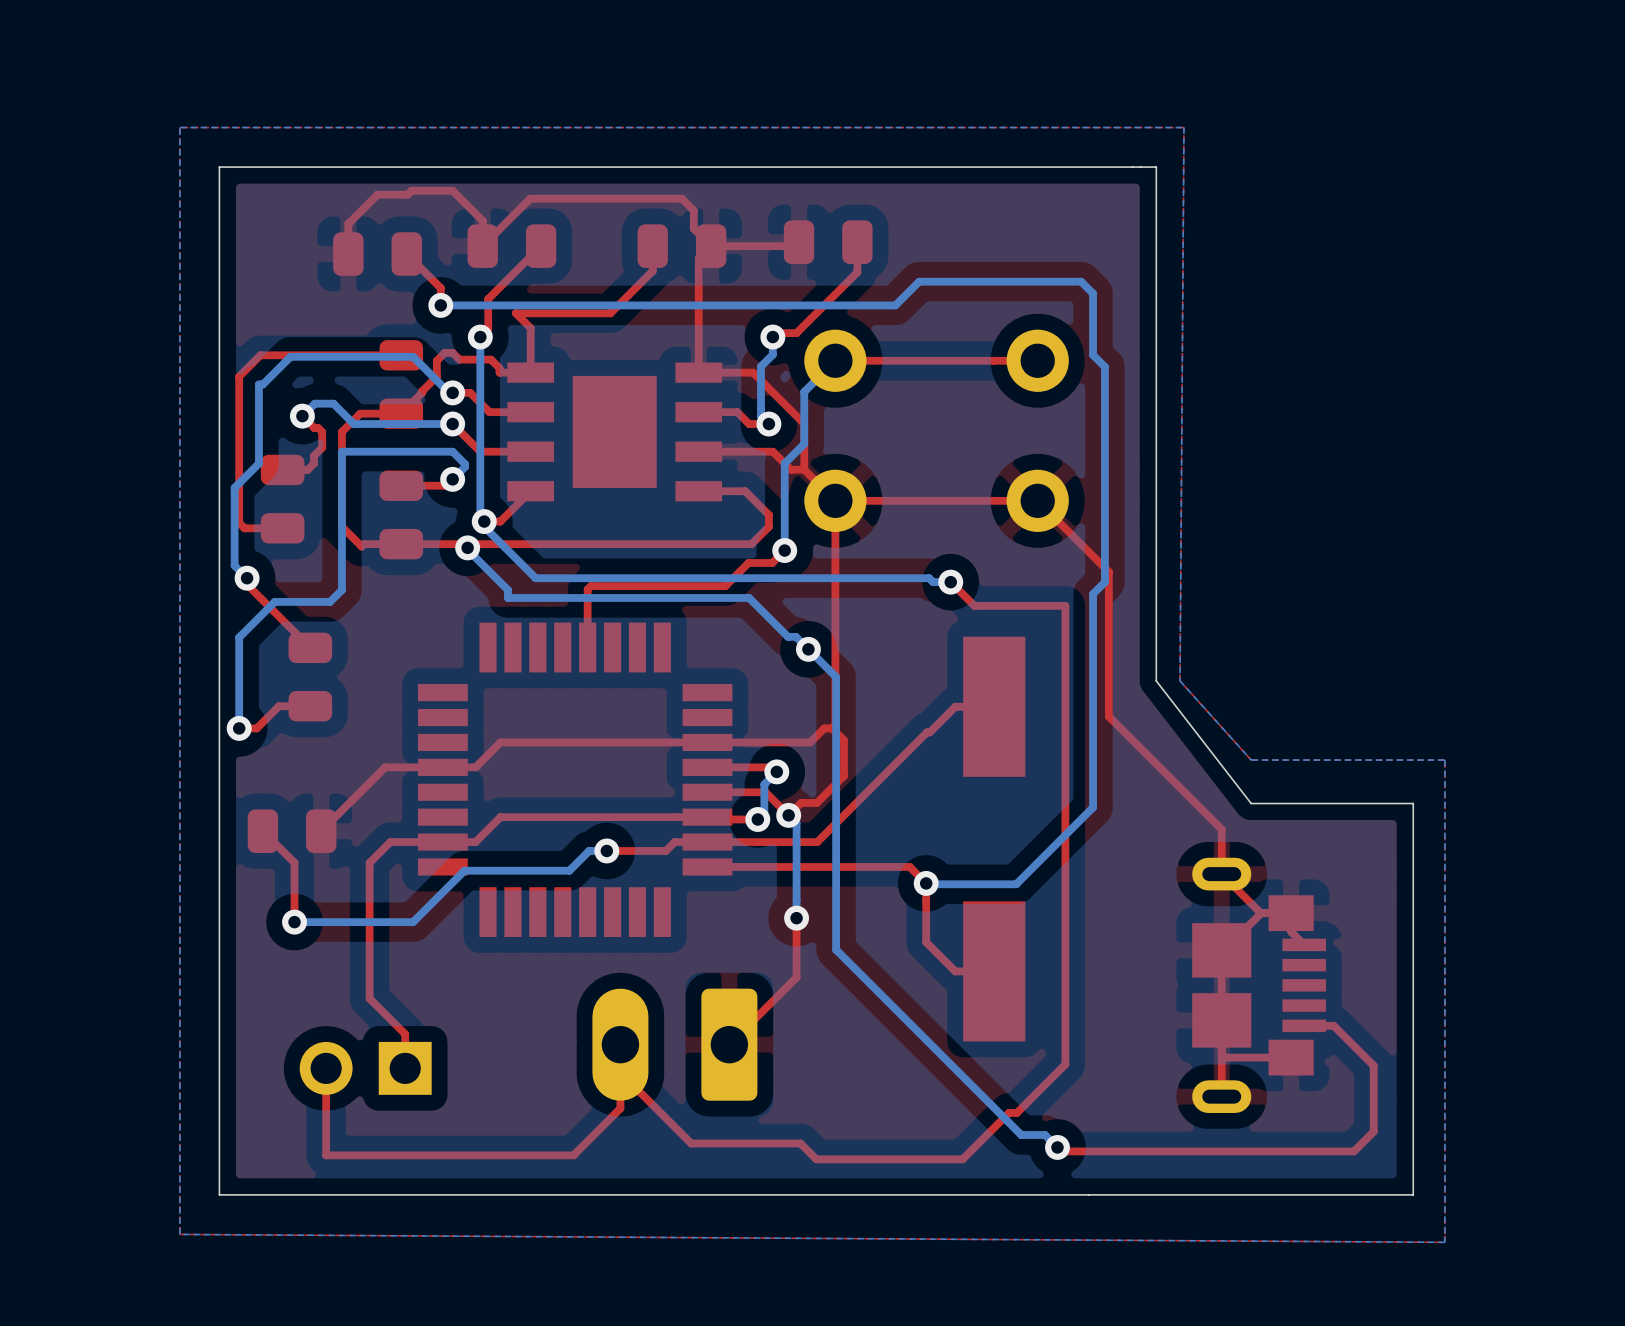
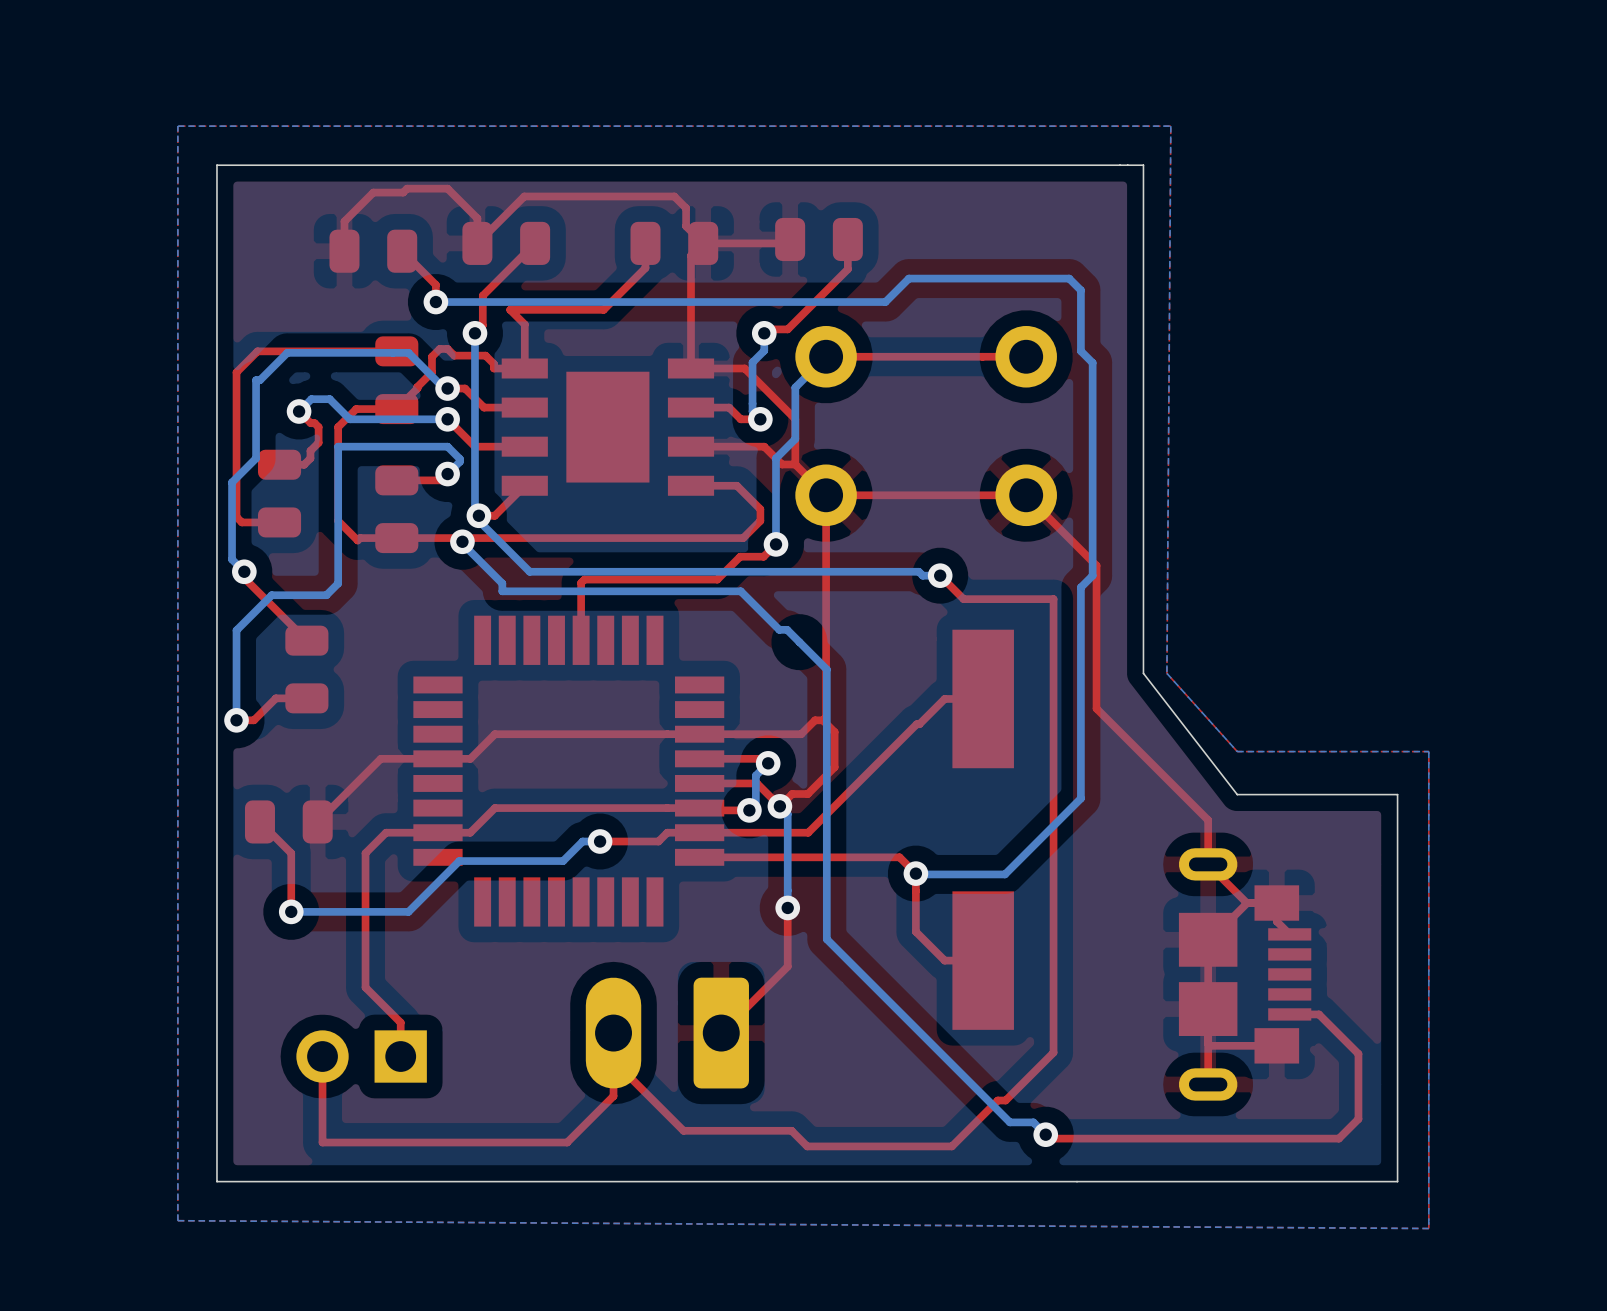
via: (808, 649) -> none

